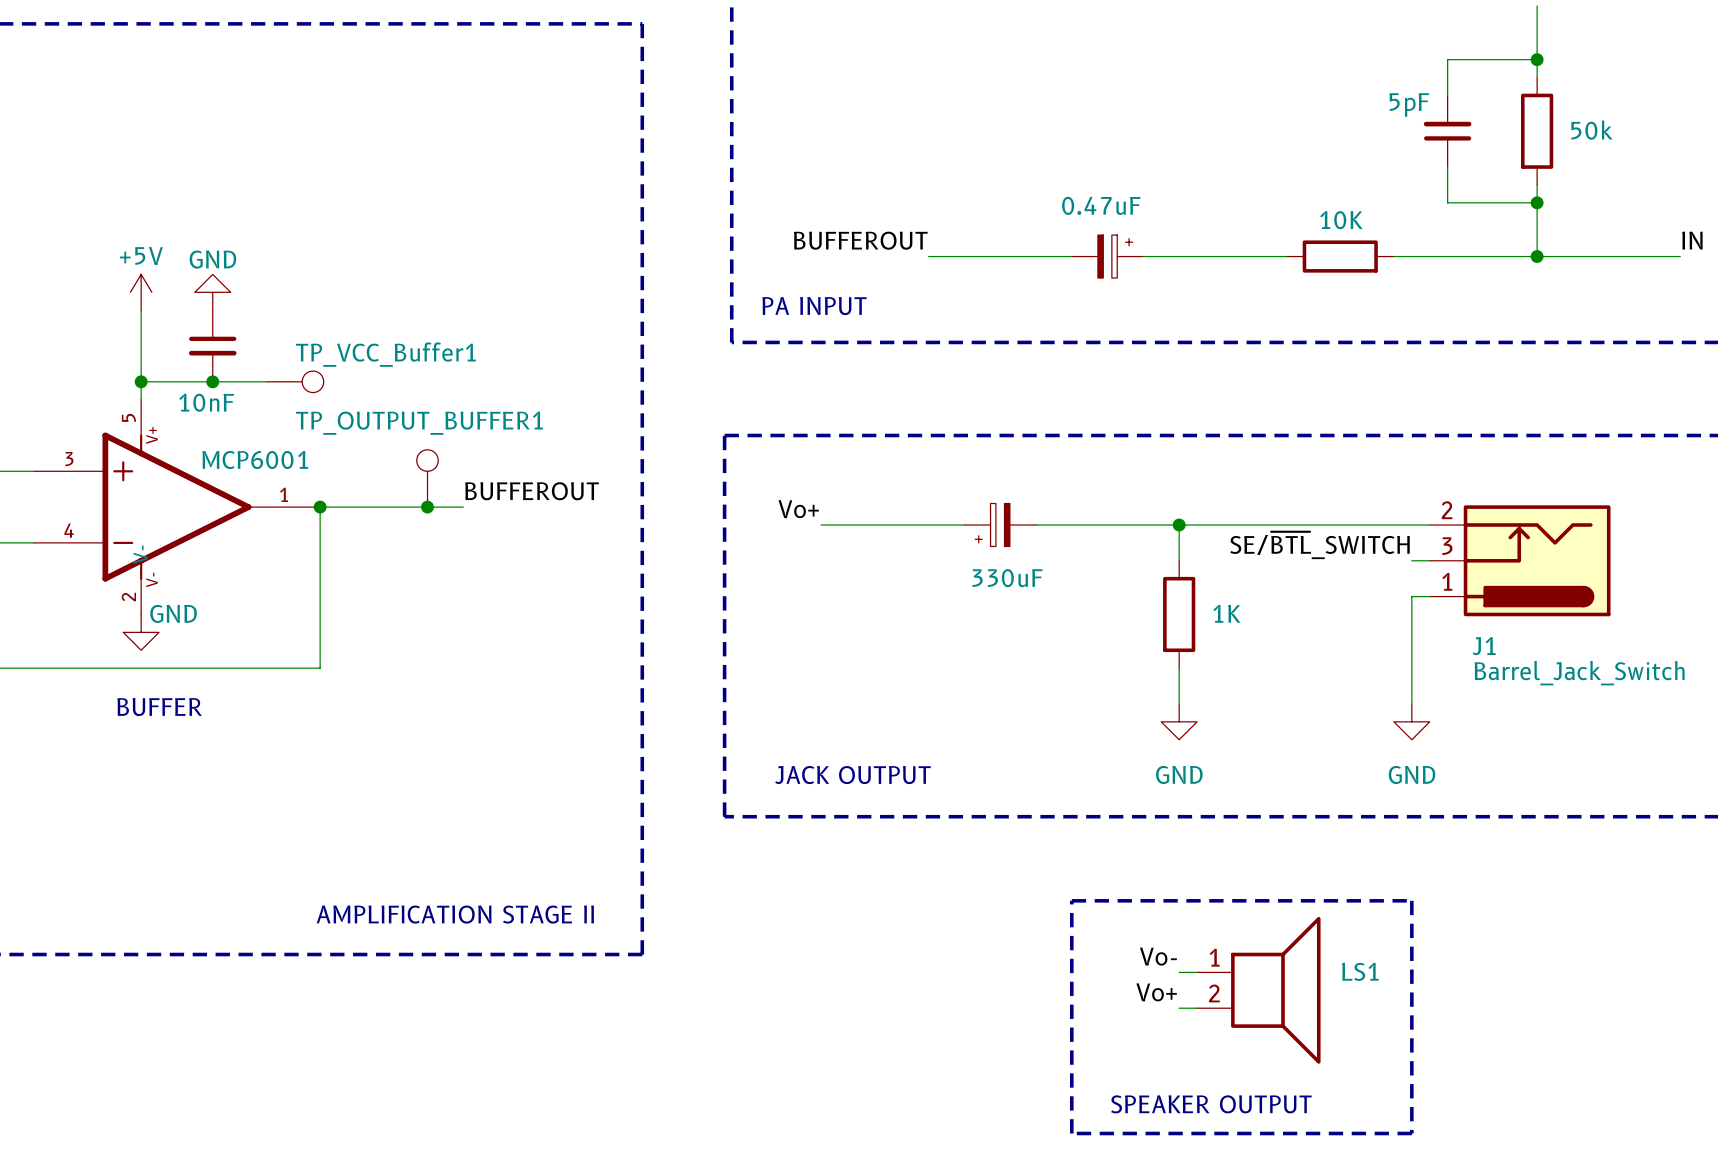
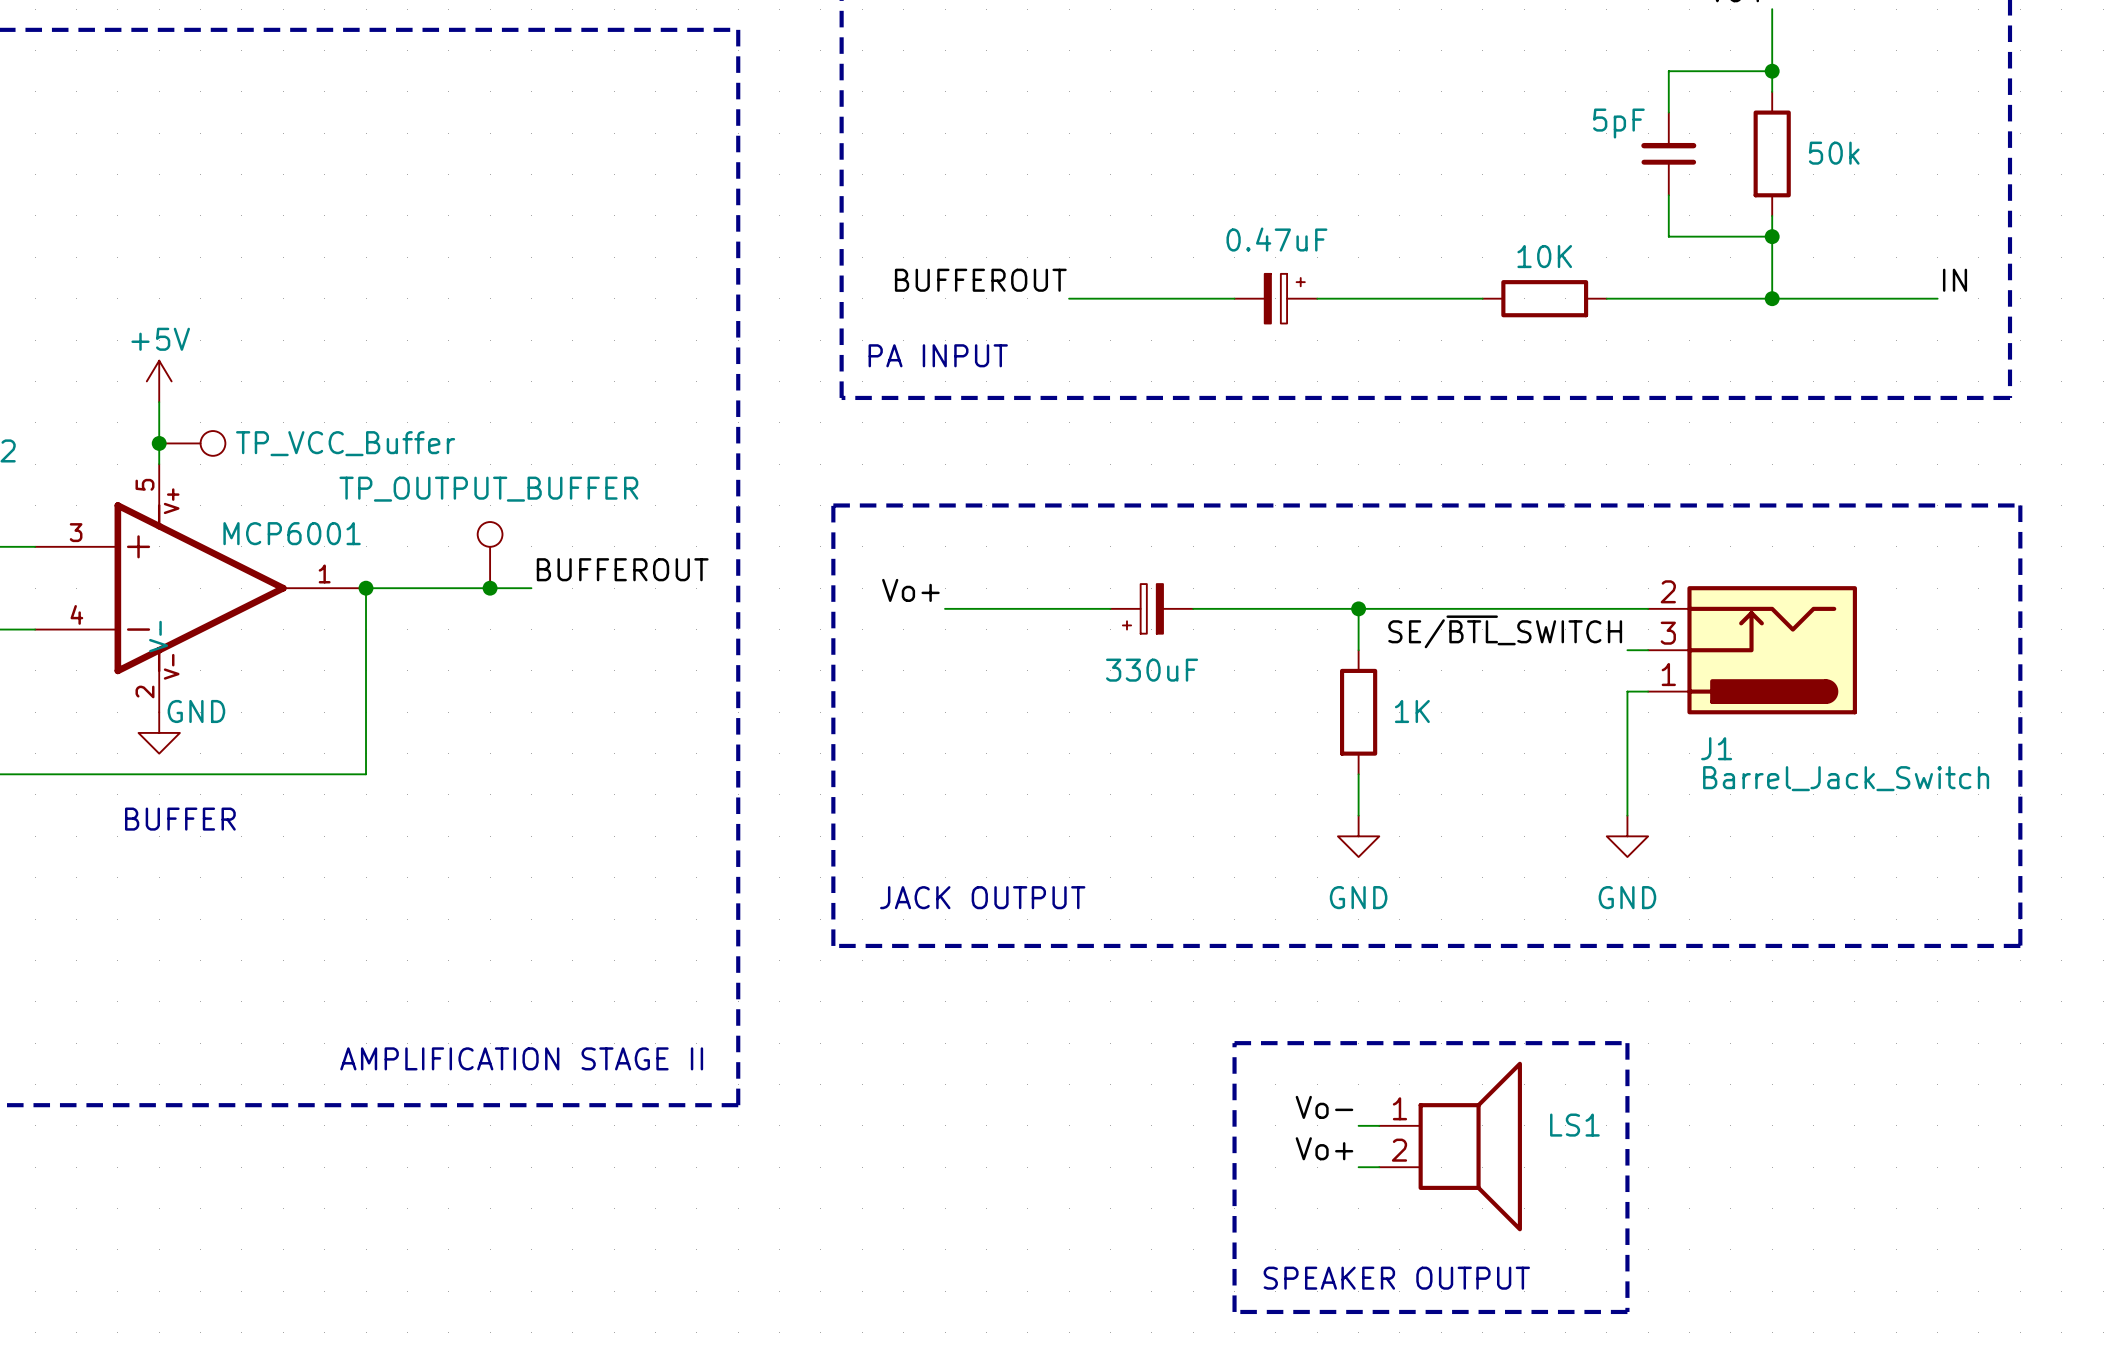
power symbol position: +5V (141, 292) -> +5V (159, 381)
power symbol: GND (212, 292) -> none
part: 10nF (212, 346) -> none
wire: (141, 381) (266, 381) -> none
TP_VCC_Buffer: none -> (192, 443)
junction: (212, 381) -> none
TP_VCC_Buffer1: (295, 381) -> none
TP_OUTPUT_BUFFER1 name: TP_OUTPUT_BUFFER1 (419, 423) -> TP_OUTPUT_BUFFER (488, 489)

